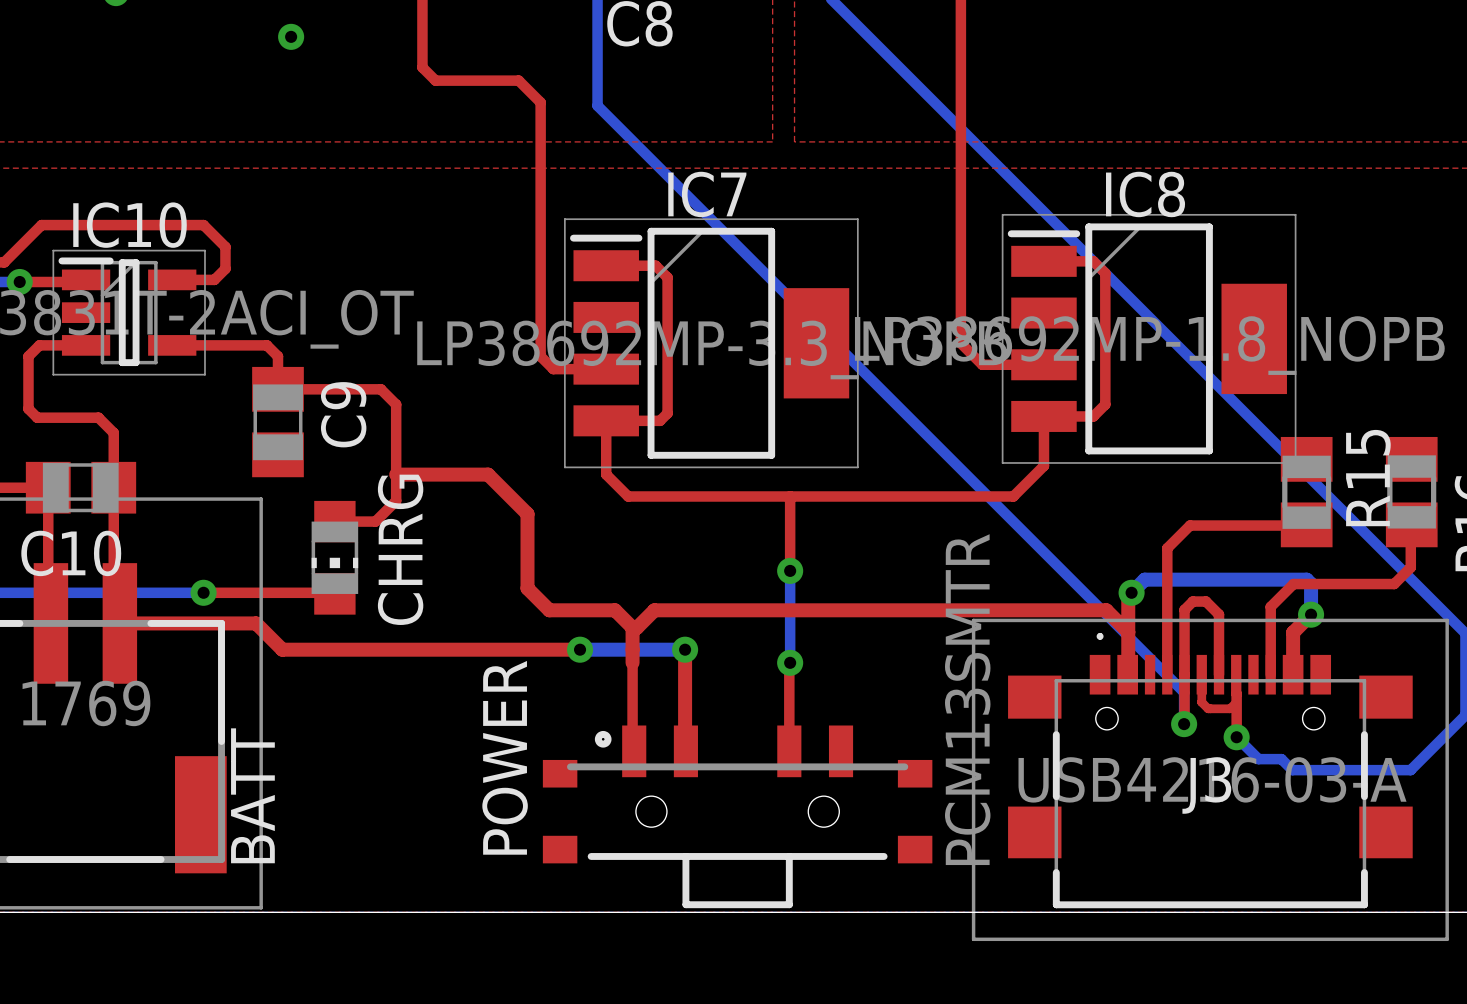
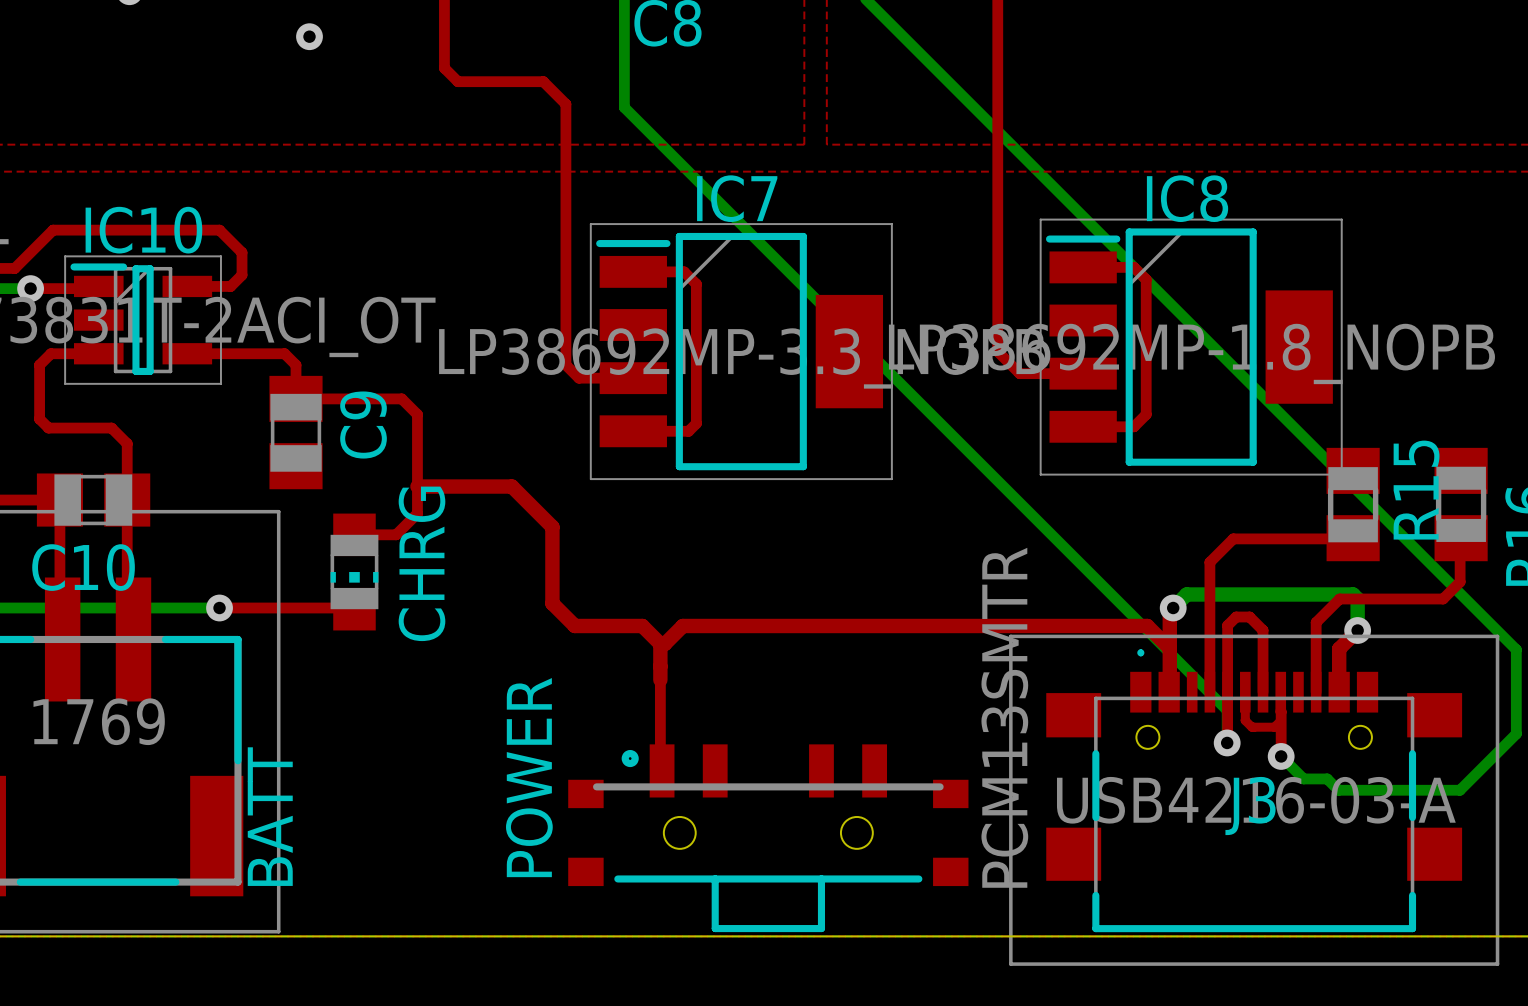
top track: (1043, 416) (1043, 465) (1013, 496) (628, 496) (606, 474) (606, 420) -> none
top track: (790, 496) (790, 570) -> none
bottom track: (790, 570) (790, 662) -> none
via: (790, 570) -> none
top track: (119, 623) (256, 623) (282, 649) (580, 649) -> none
bottom track: (580, 649) (685, 649) -> none
via: (580, 649) -> none
top track: (685, 649) (685, 751) -> none
via: (685, 649) -> none
top track: (790, 662) (789, 751) -> none
via: (790, 662) -> none

